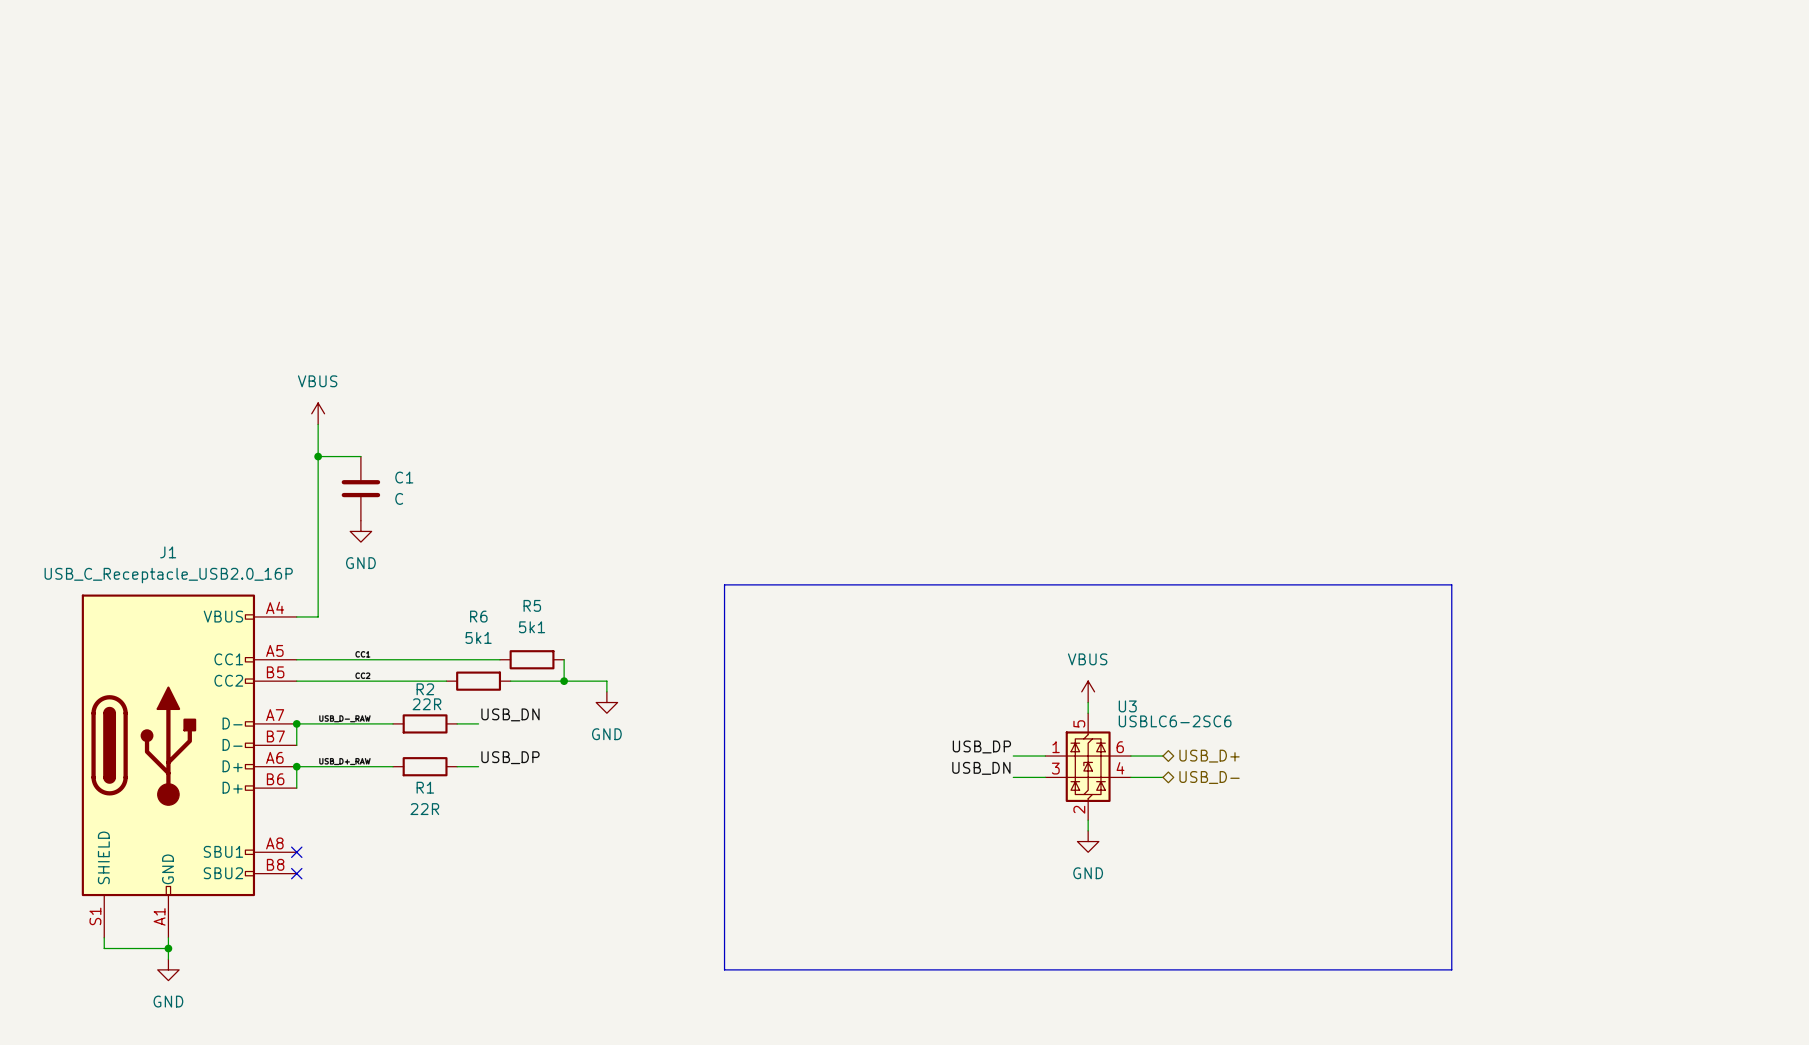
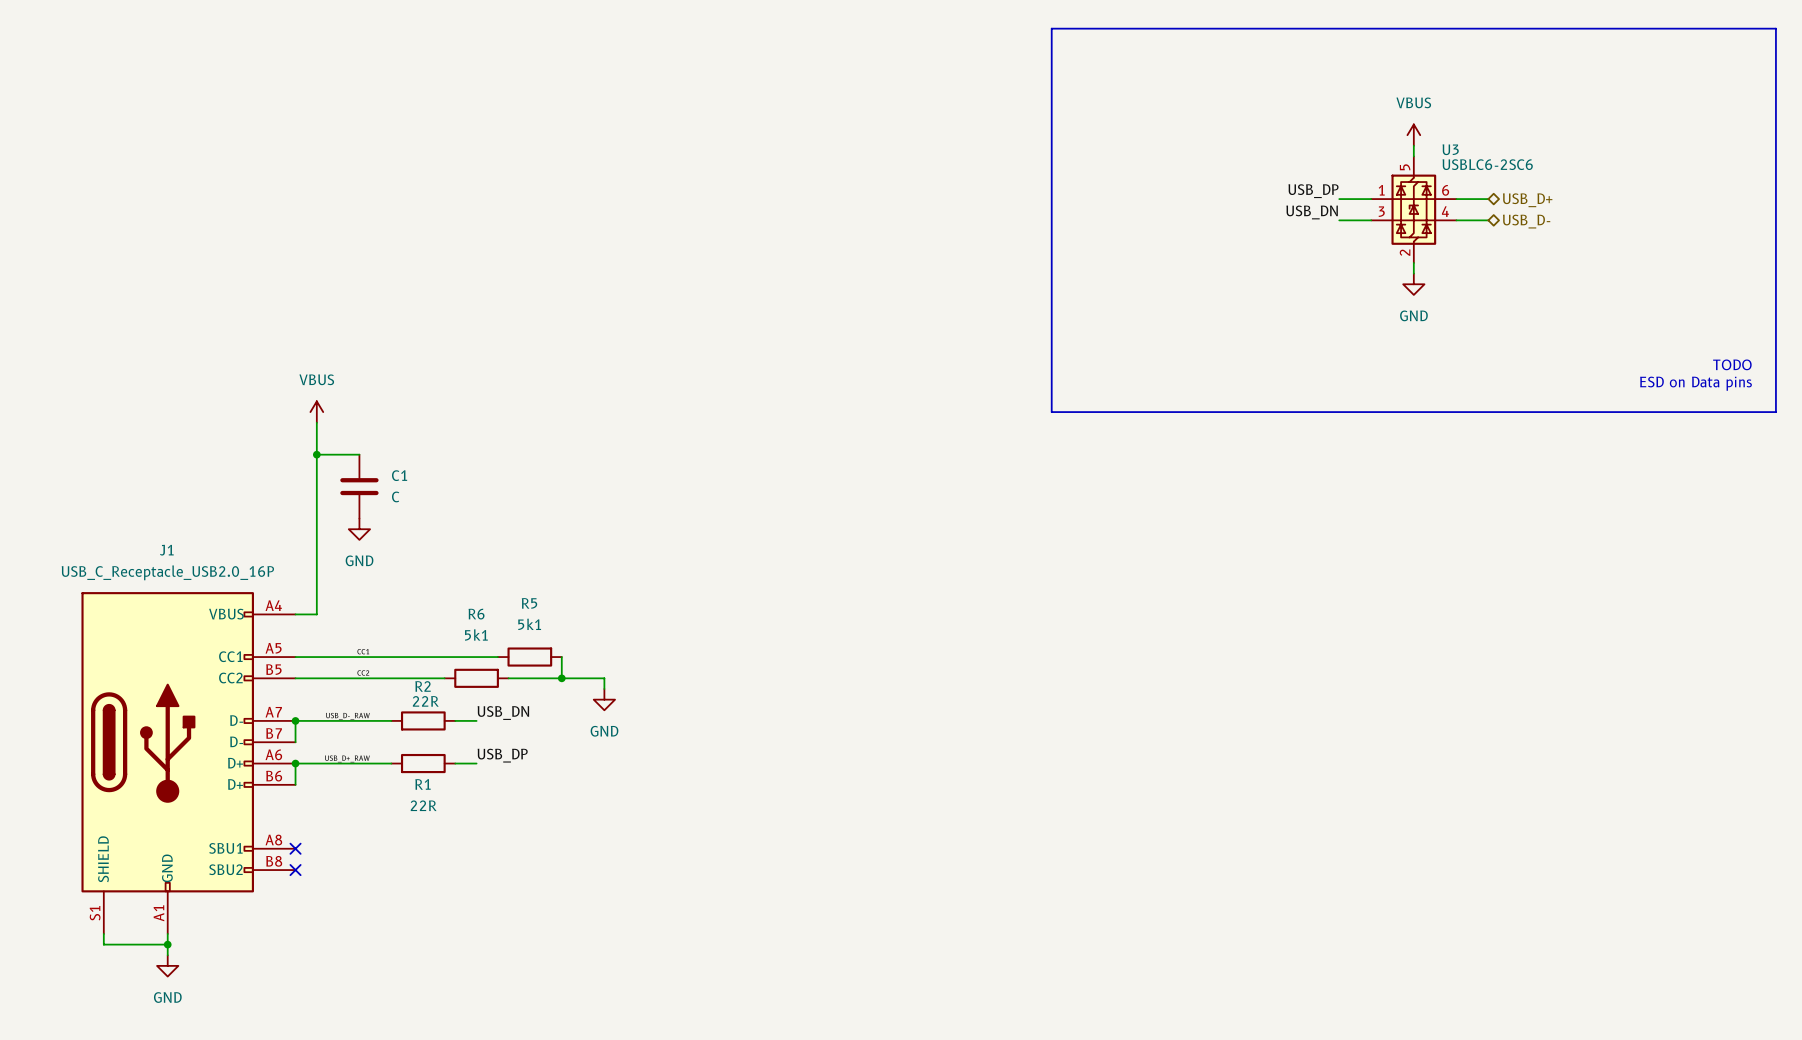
line: none -> (1051, 28) (1775, 28) (1775, 412) (1051, 412) (1051, 28)
power symbol: none -> VBUS (1413, 135)
wire: none -> (1413, 145) (1413, 156)
label: none -> USB_DP (1313, 191)
wire: none -> (1339, 199) (1371, 199)
wire: none -> (1456, 199) (1488, 199)
hierarchical label: none -> USB_D+ (1527, 200)
label: none -> USB_DN (1312, 212)
wire: none -> (1339, 220) (1371, 220)
wire: none -> (1456, 220) (1488, 220)
hierarchical label: none -> USB_D- (1526, 221)
wire: none -> (1413, 262) (1413, 273)
power symbol: none -> GND (1413, 284)
text: none -> TODO (1732, 364)
text: none -> ESD on Data pins (1695, 383)
line: (724, 584) (1451, 584) (1451, 969) (724, 969) (724, 584) -> none
power symbol: VBUS (1088, 691) -> none
wire: (1088, 702) (1088, 713) -> none
label: USB_DP (981, 746) -> none
wire: (1013, 756) (1045, 756) -> none
wire: (1130, 756) (1163, 756) -> none
hierarchical label: USB_D+ (1209, 756) -> none
U3 position: (1088, 766) -> (1413, 209)
label: USB_DN (981, 768) -> none
wire: (1013, 777) (1045, 777) -> none
wire: (1130, 777) (1163, 777) -> none
hierarchical label: USB_D- (1209, 777) -> none
wire: (1088, 820) (1088, 830) -> none
power symbol: GND (1088, 841) -> none

